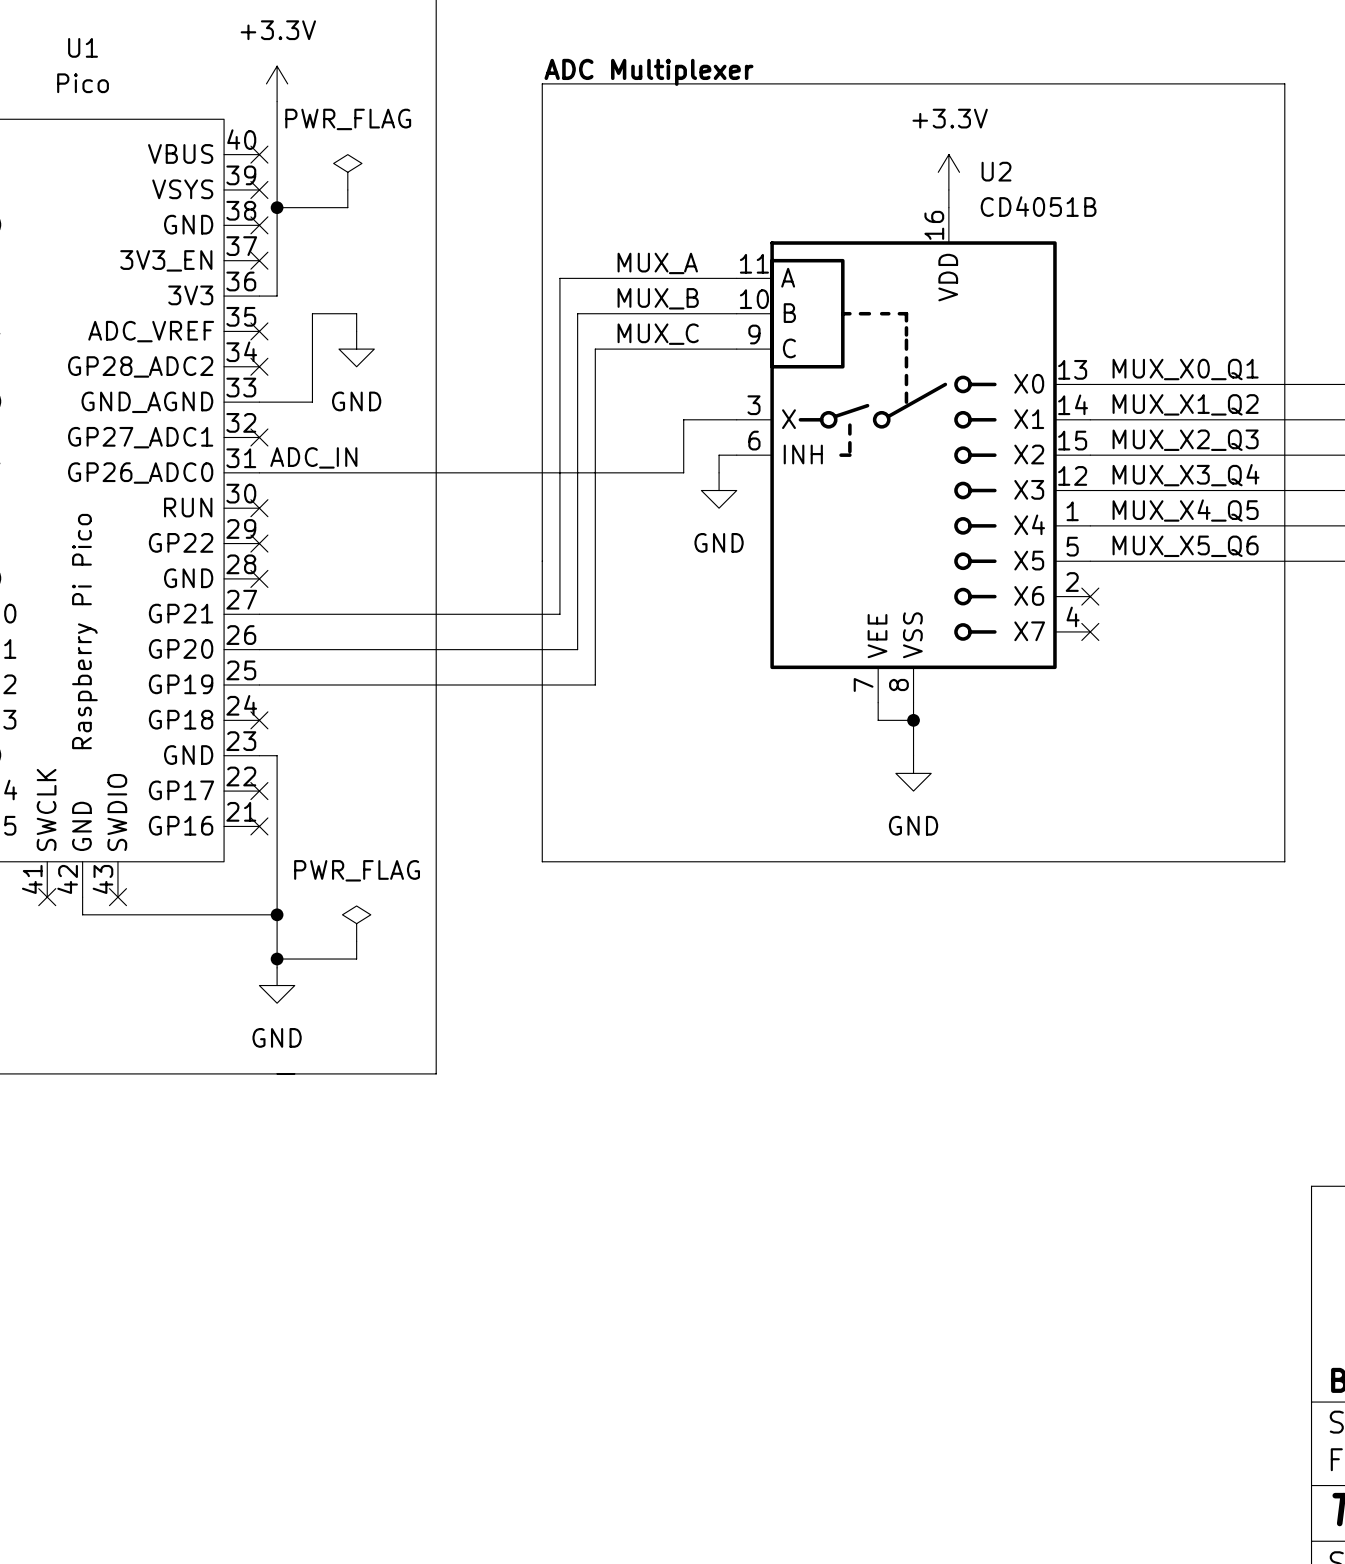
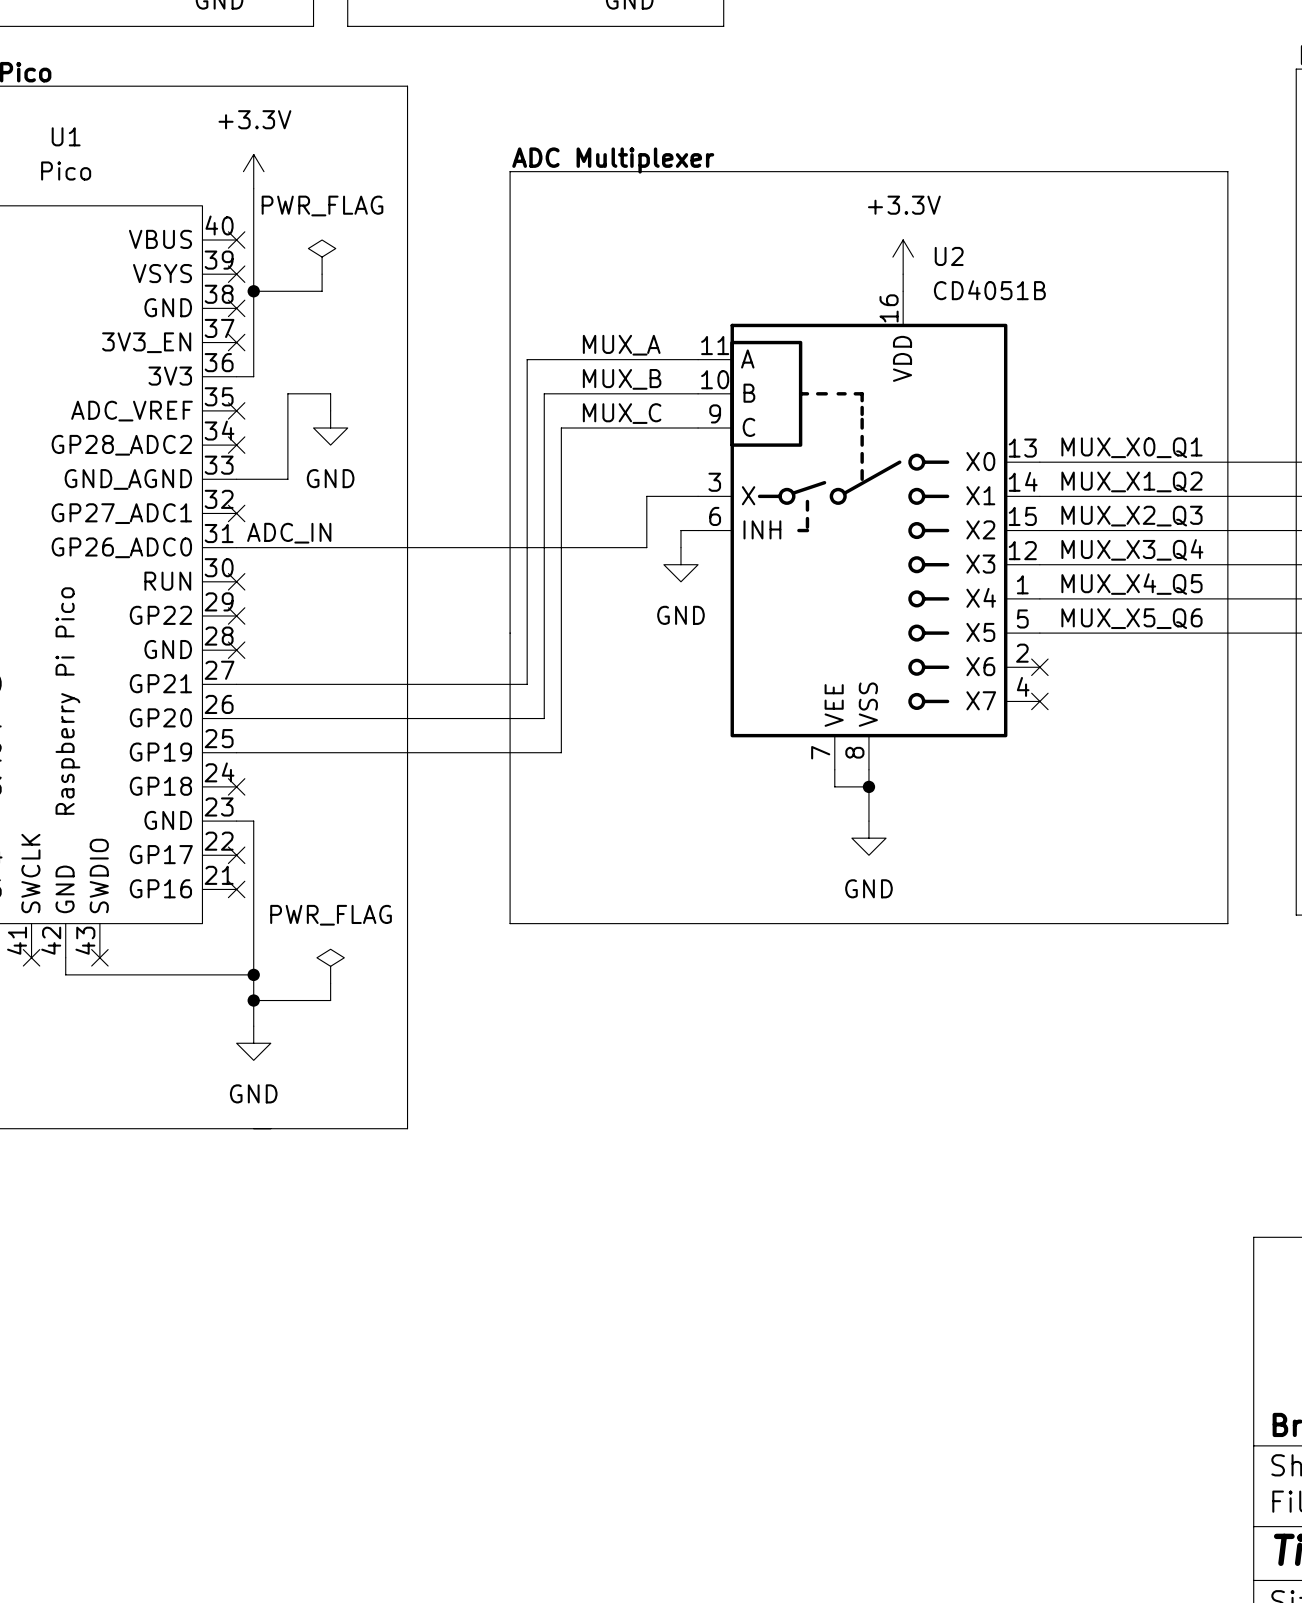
power symbol position: PWR_FLAG (356, 923) -> PWR_FLAG (330, 966)
wire: (356, 941) (356, 959) (277, 959) -> (330, 983) (330, 1000) (253, 1000)
junction position: (277, 959) -> (253, 1000)

